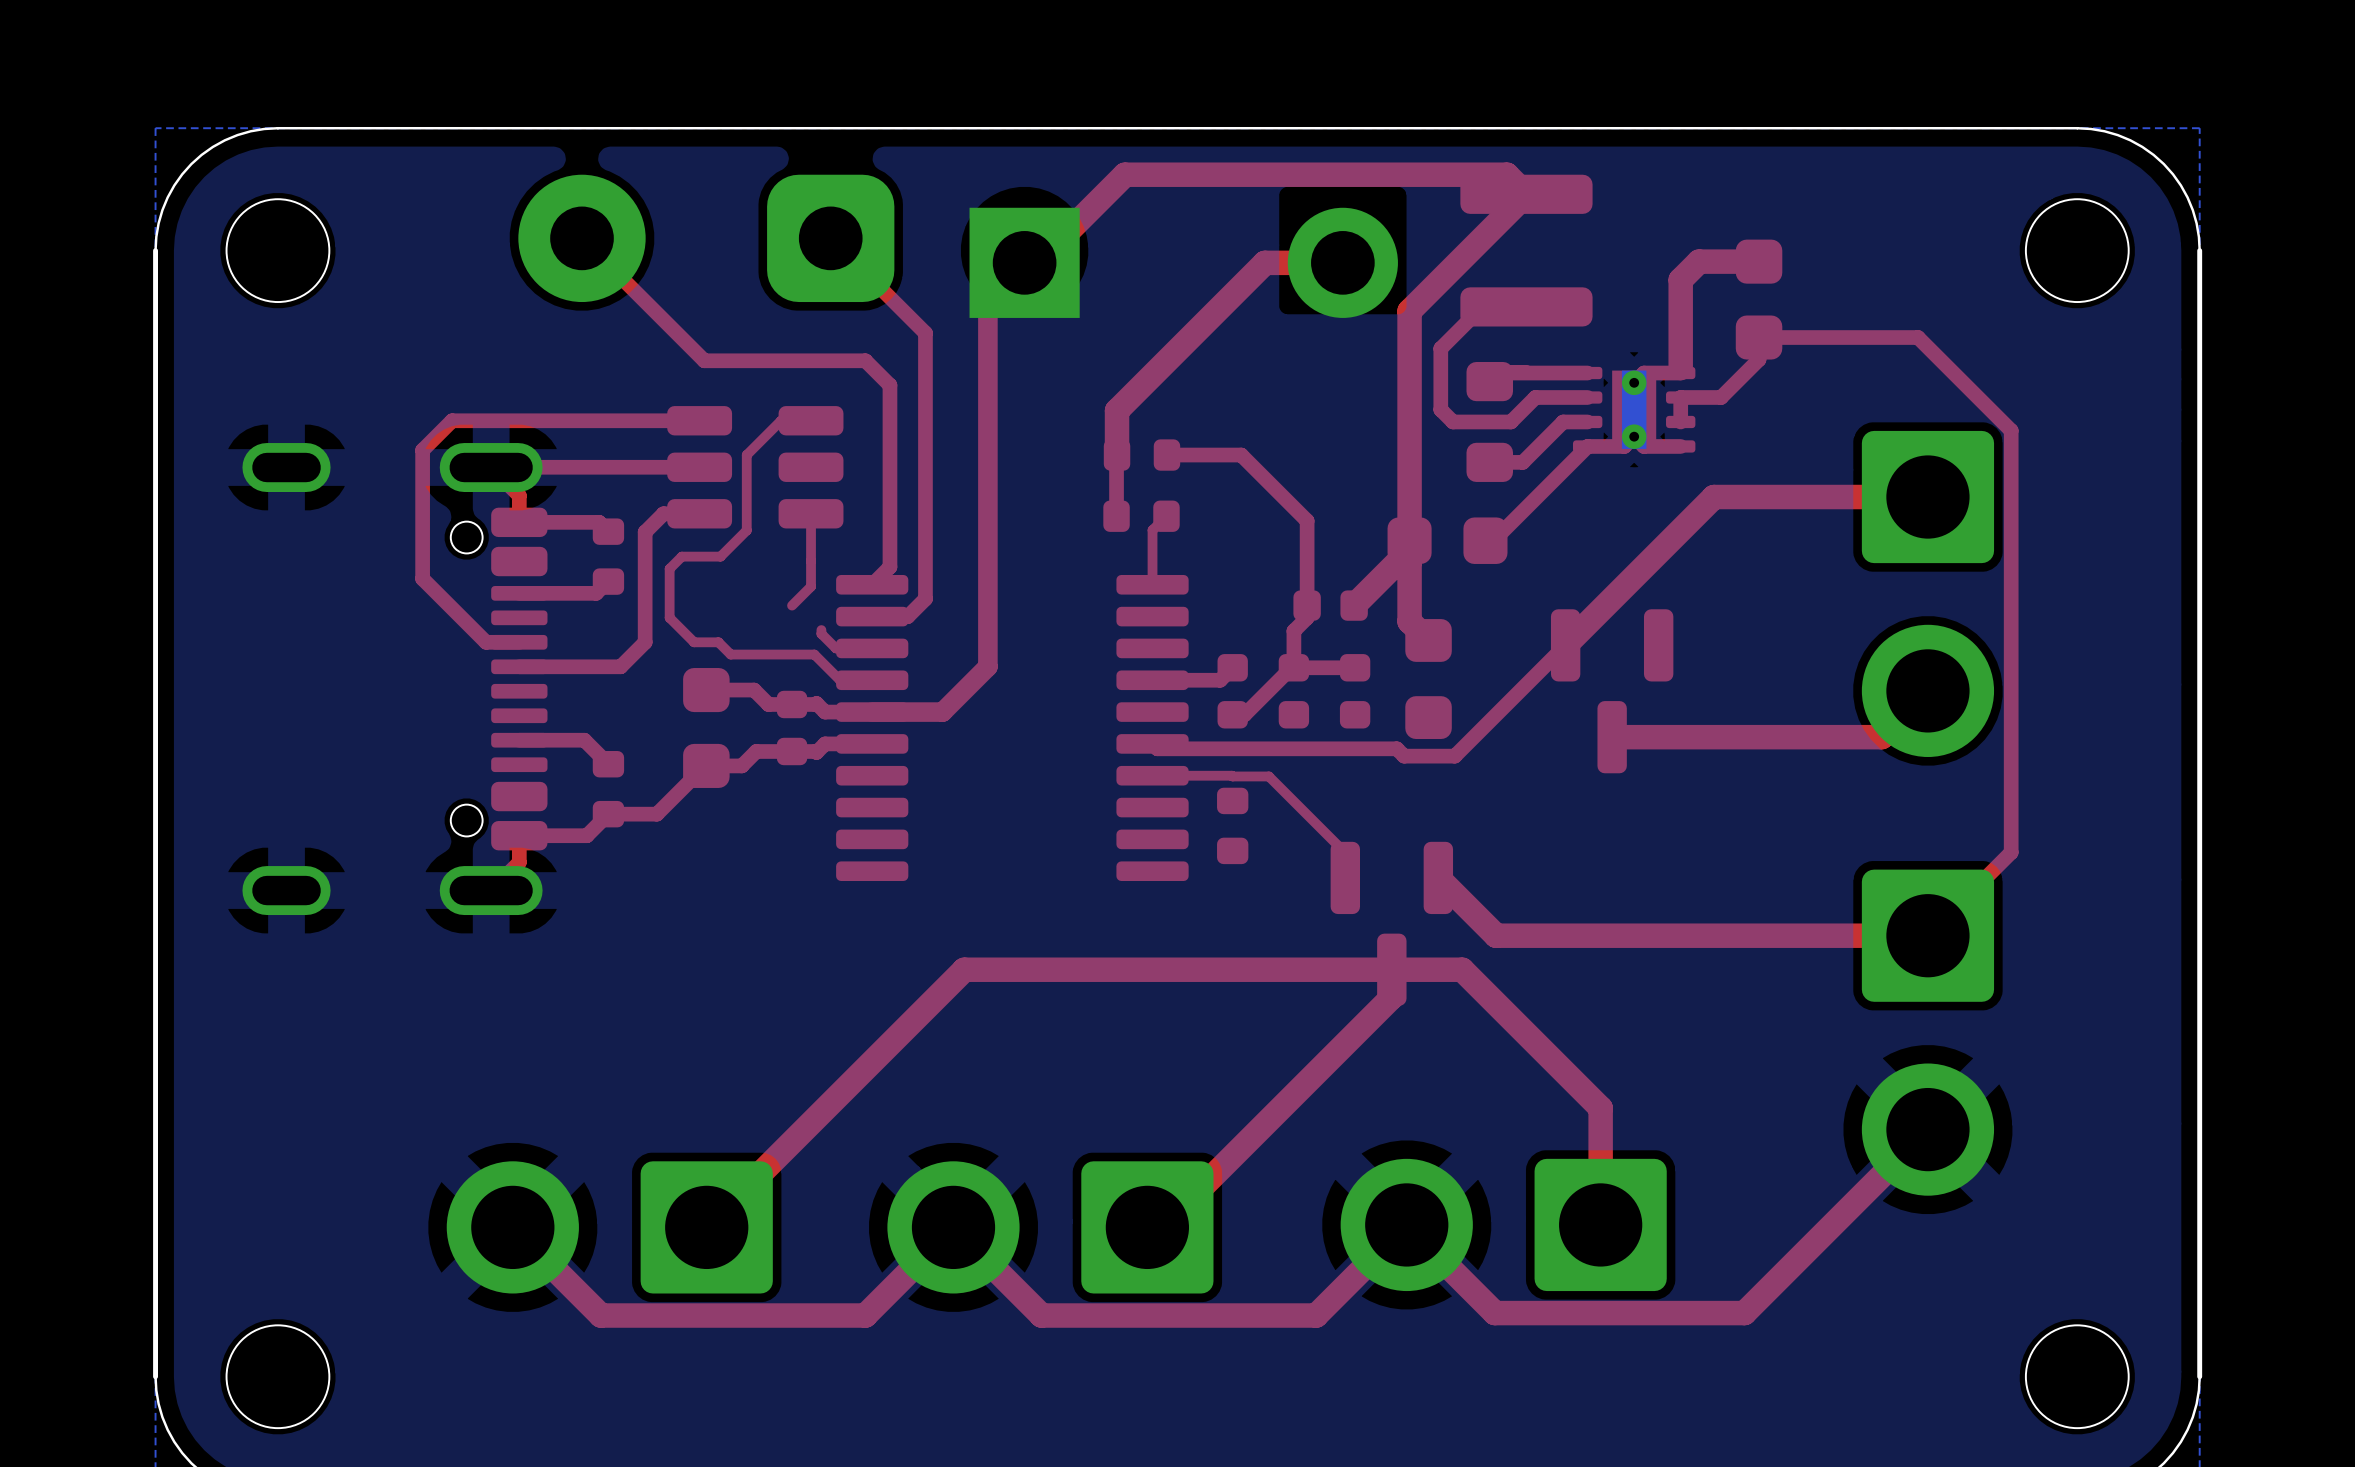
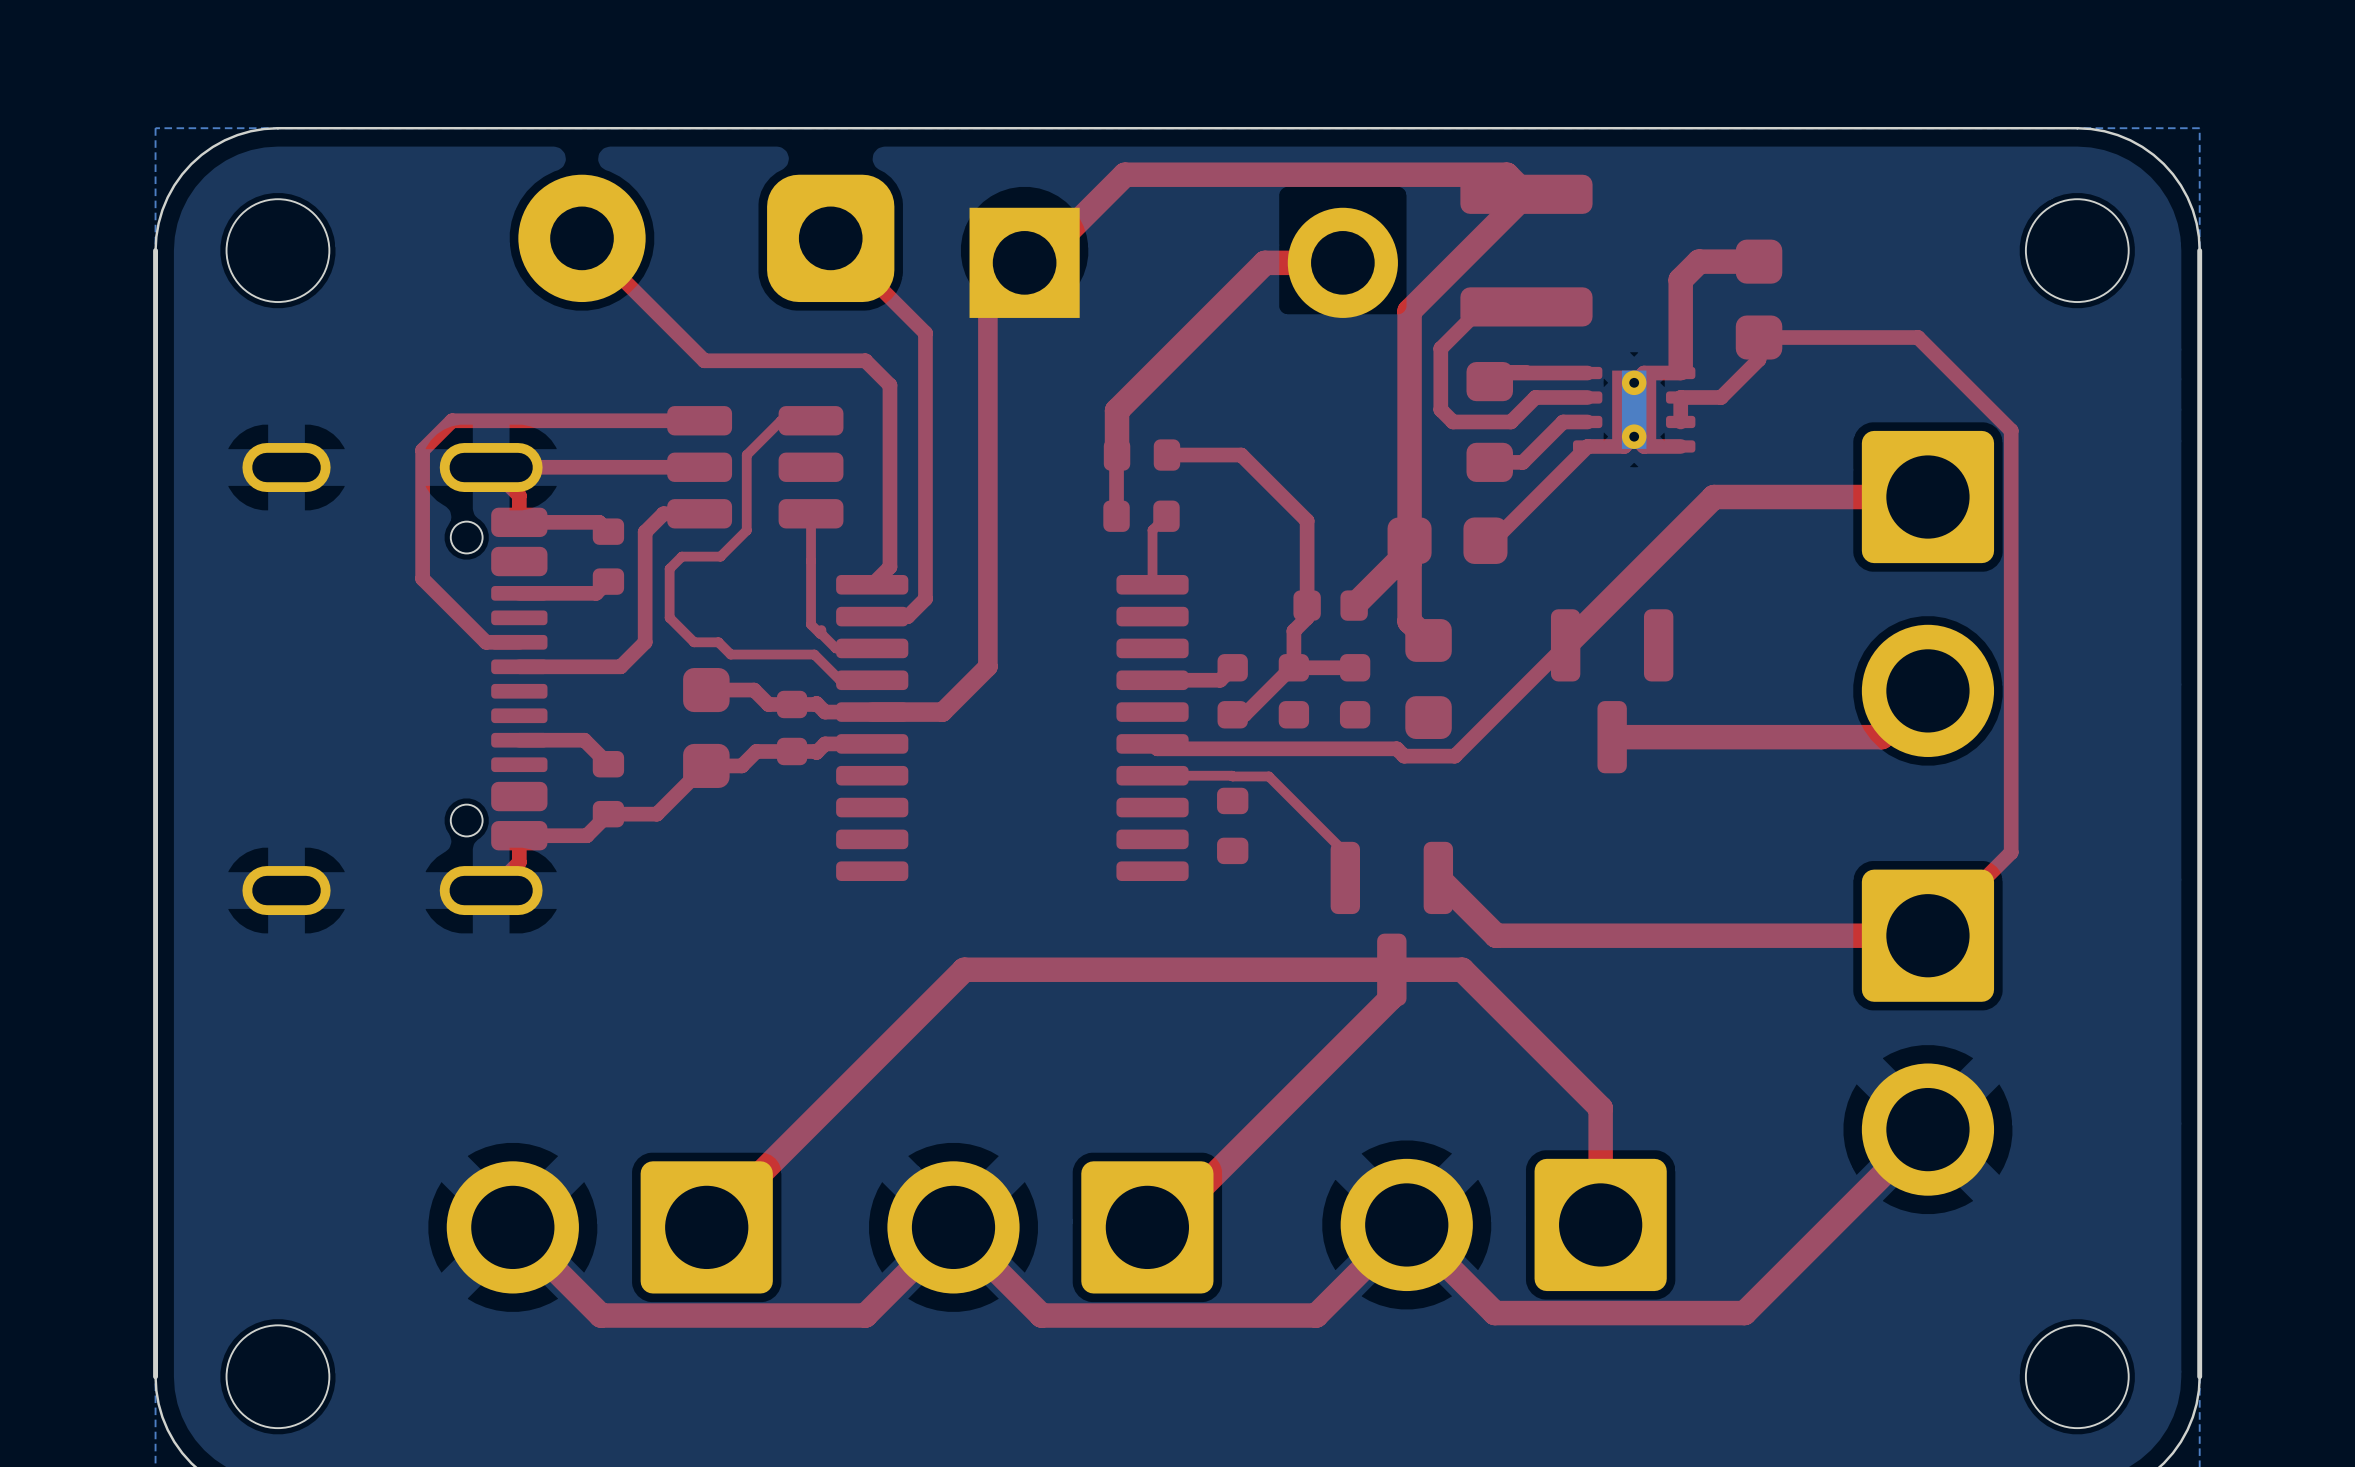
top track: (811, 586) (792, 605) -> (811, 586) (811, 624) (821, 633)

